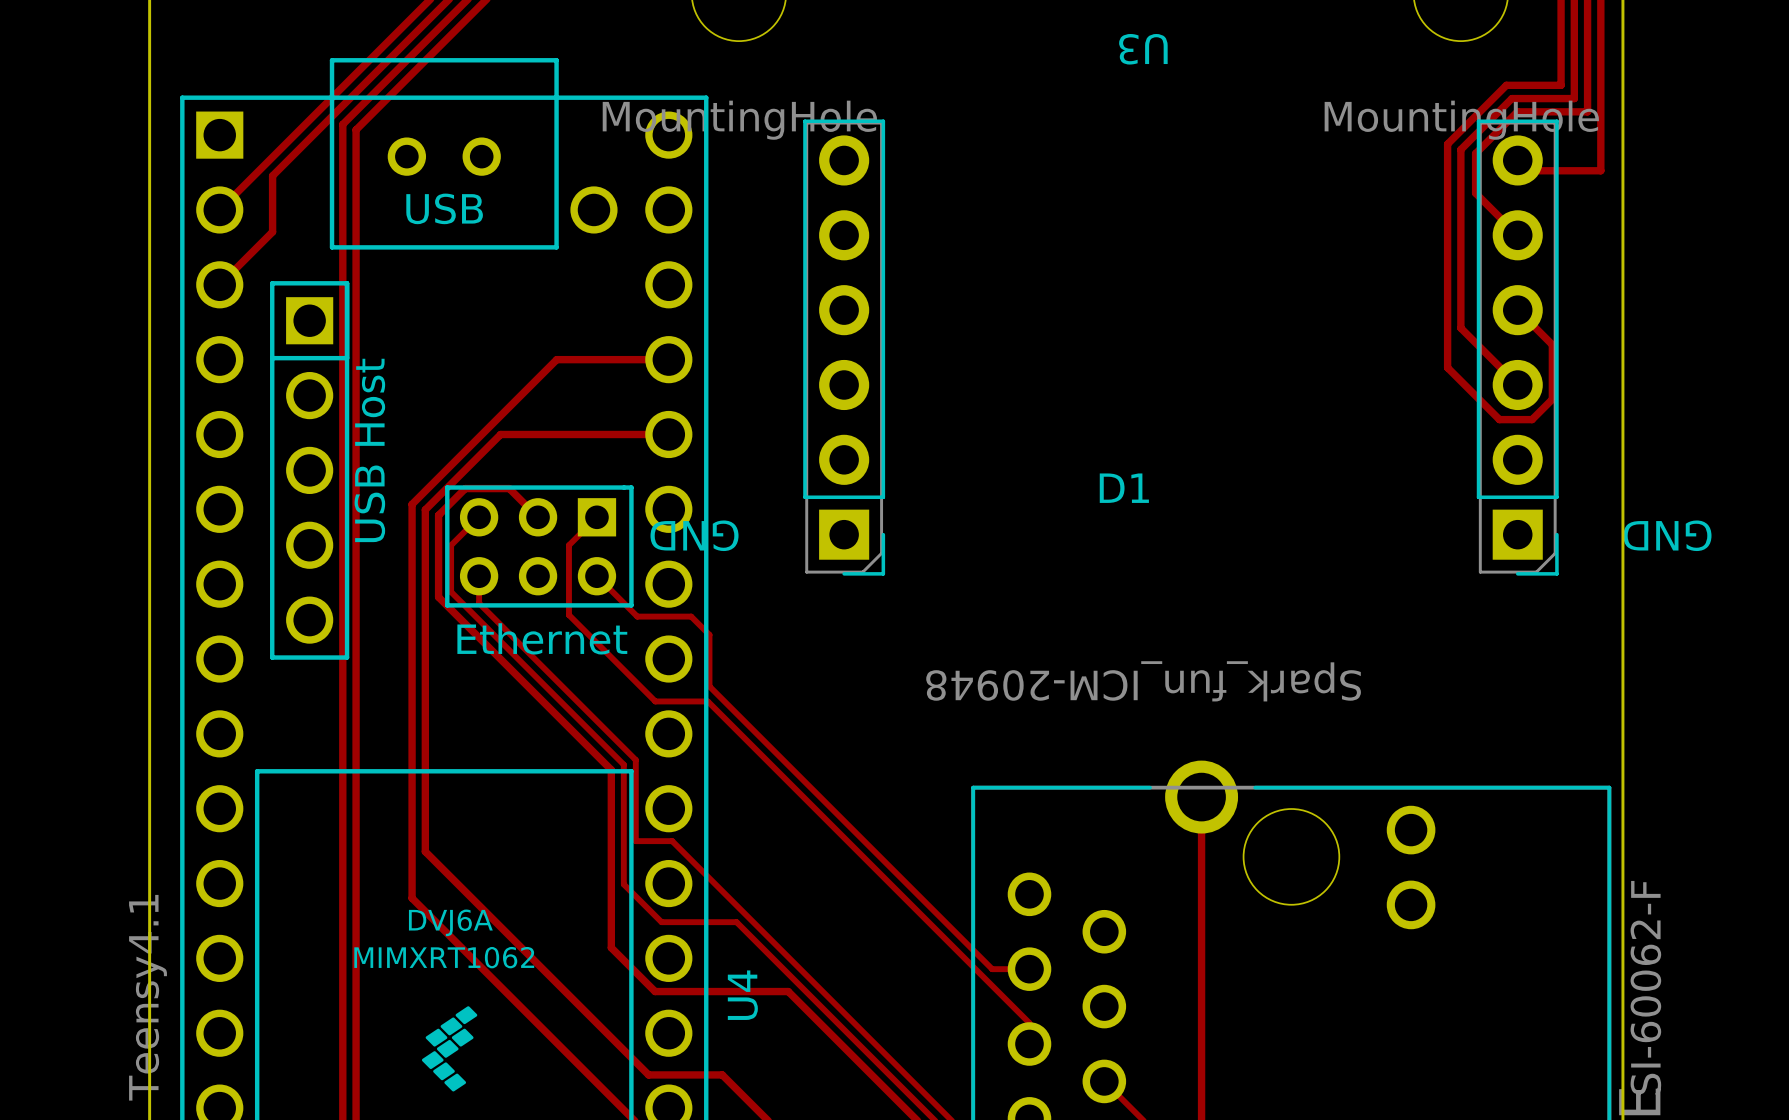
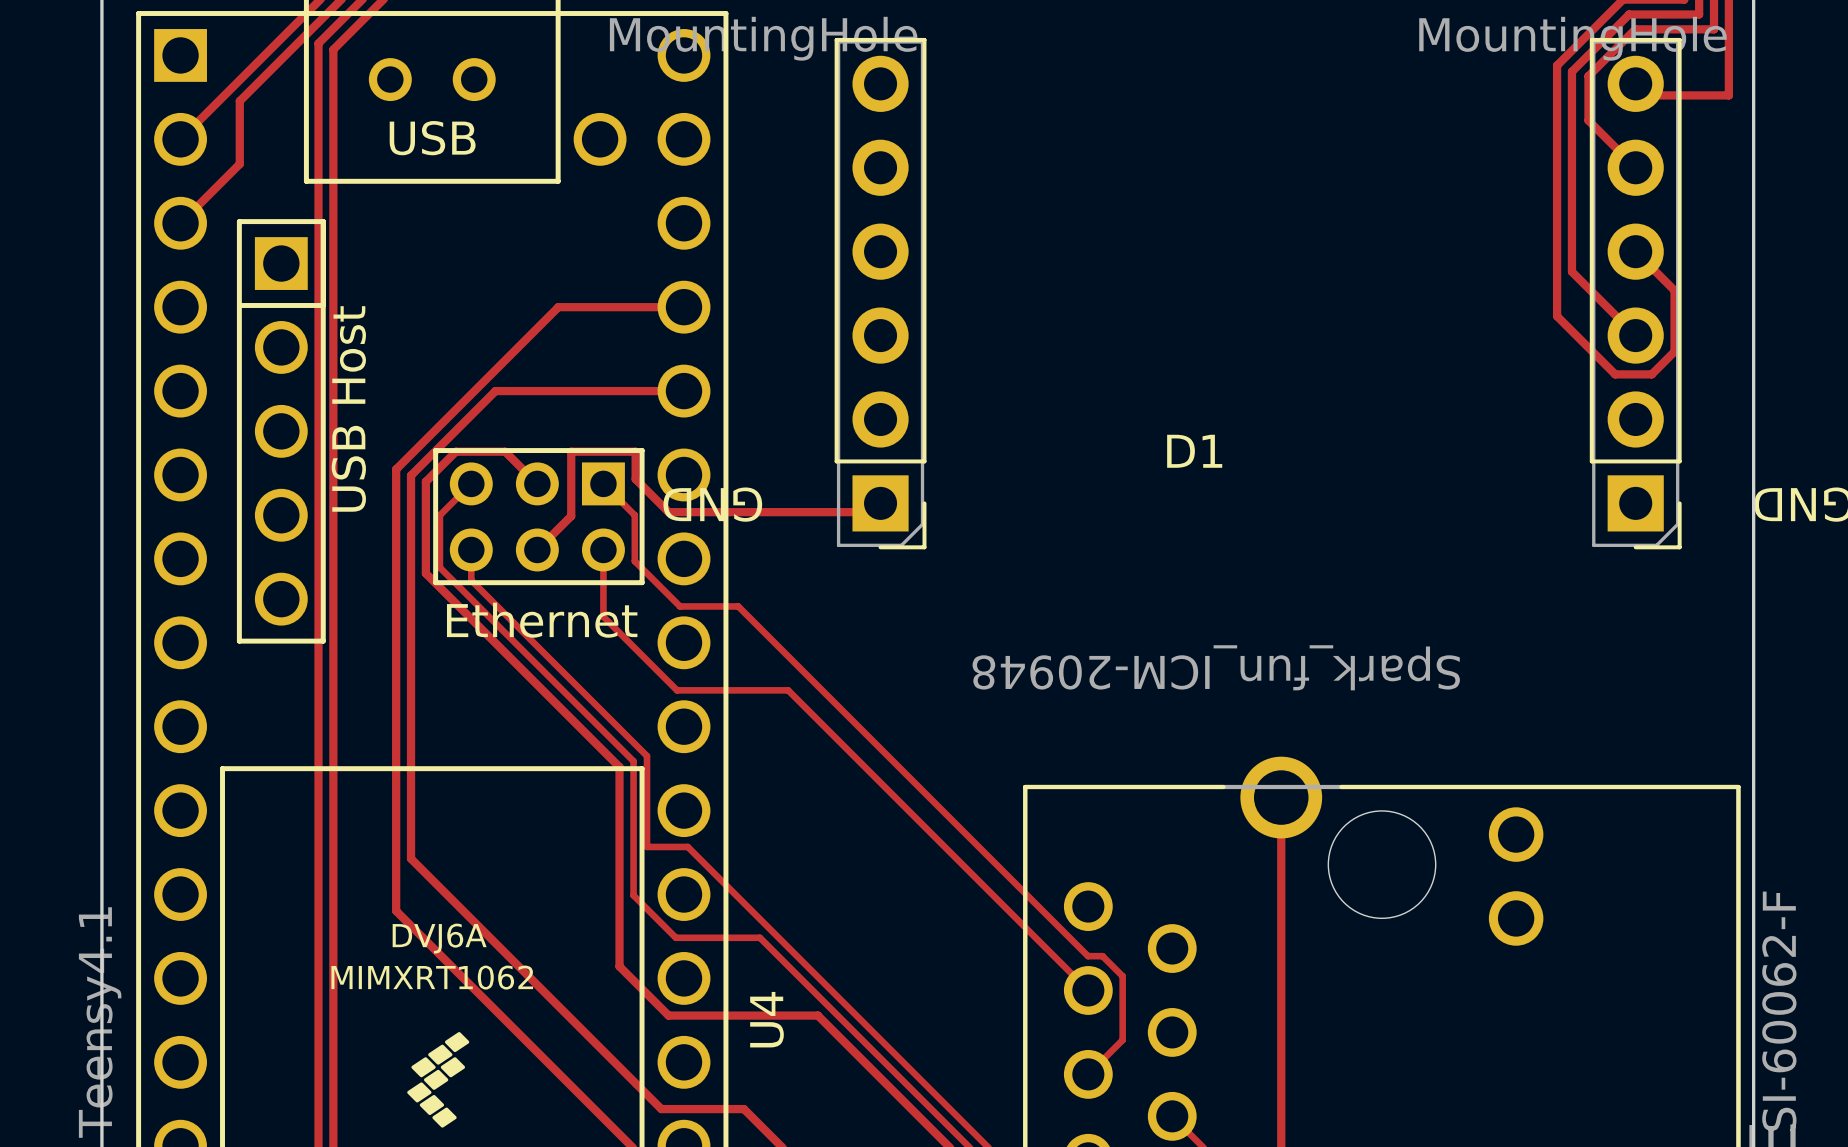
track: (596, 517) (568, 545) (568, 615) (655, 701) (662, 701) -> (603, 549) (603, 616) (677, 690)
track: none -> (603, 483) (634, 515) (634, 561) (680, 606) (738, 606) (1088, 956) (1102, 956) (1122, 976) (1122, 1040) (1088, 1074)
track: none -> (880, 503) (871, 512) (668, 512) (635, 479) (635, 451) (571, 451) (571, 516) (537, 549)
track: (596, 576) (637, 616) (691, 616) (709, 634) (709, 686) (992, 969) (1029, 969) -> none
track: (707, 701) (1029, 1023) (1029, 1044) -> (727, 690) (788, 690) (1088, 990)

